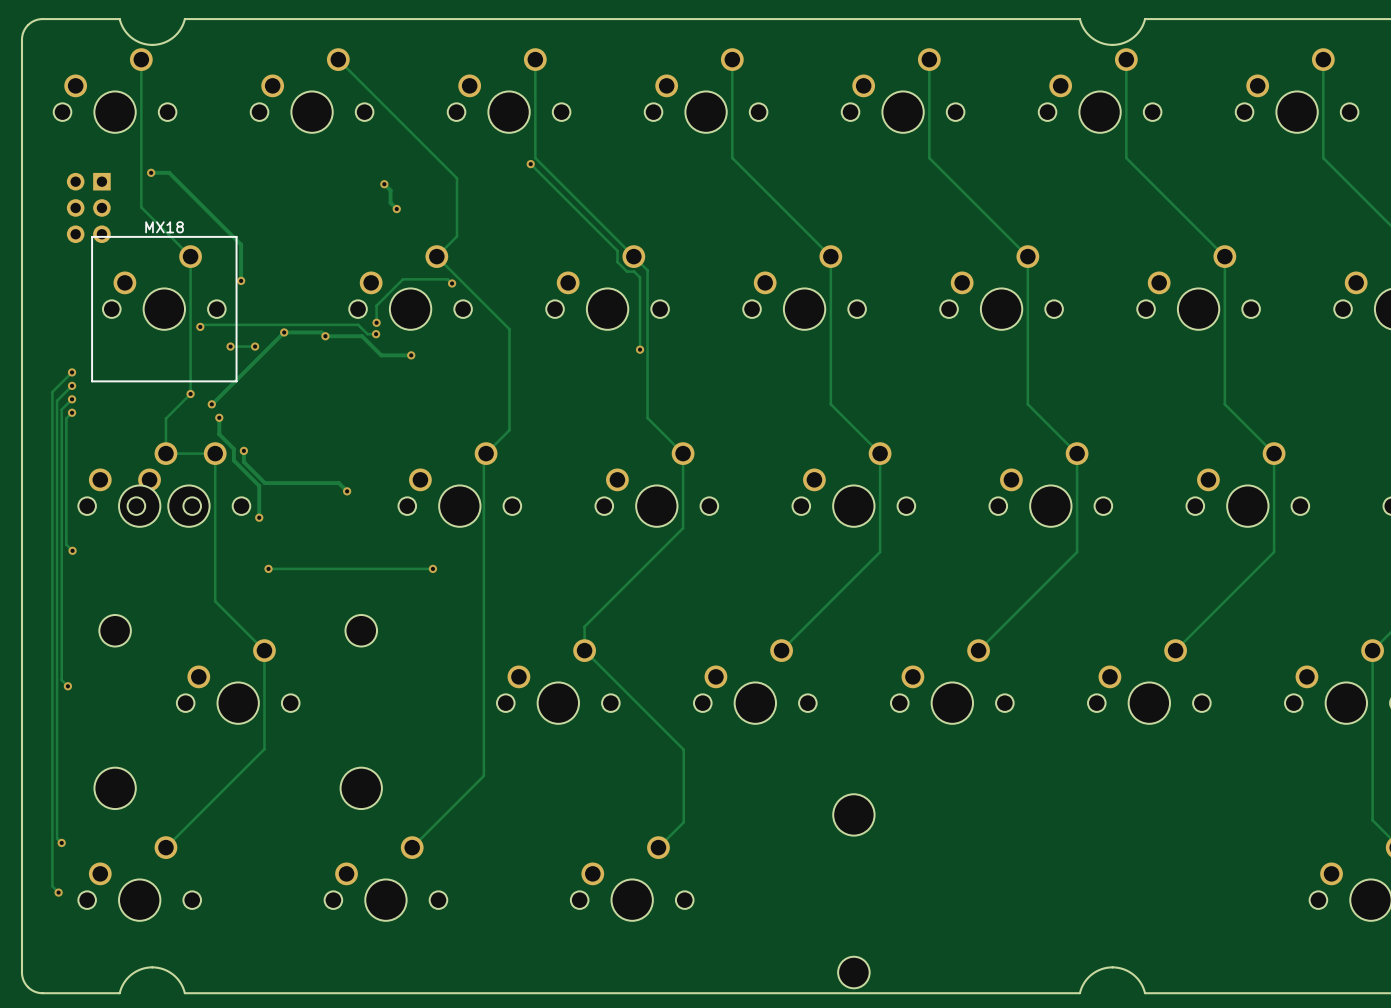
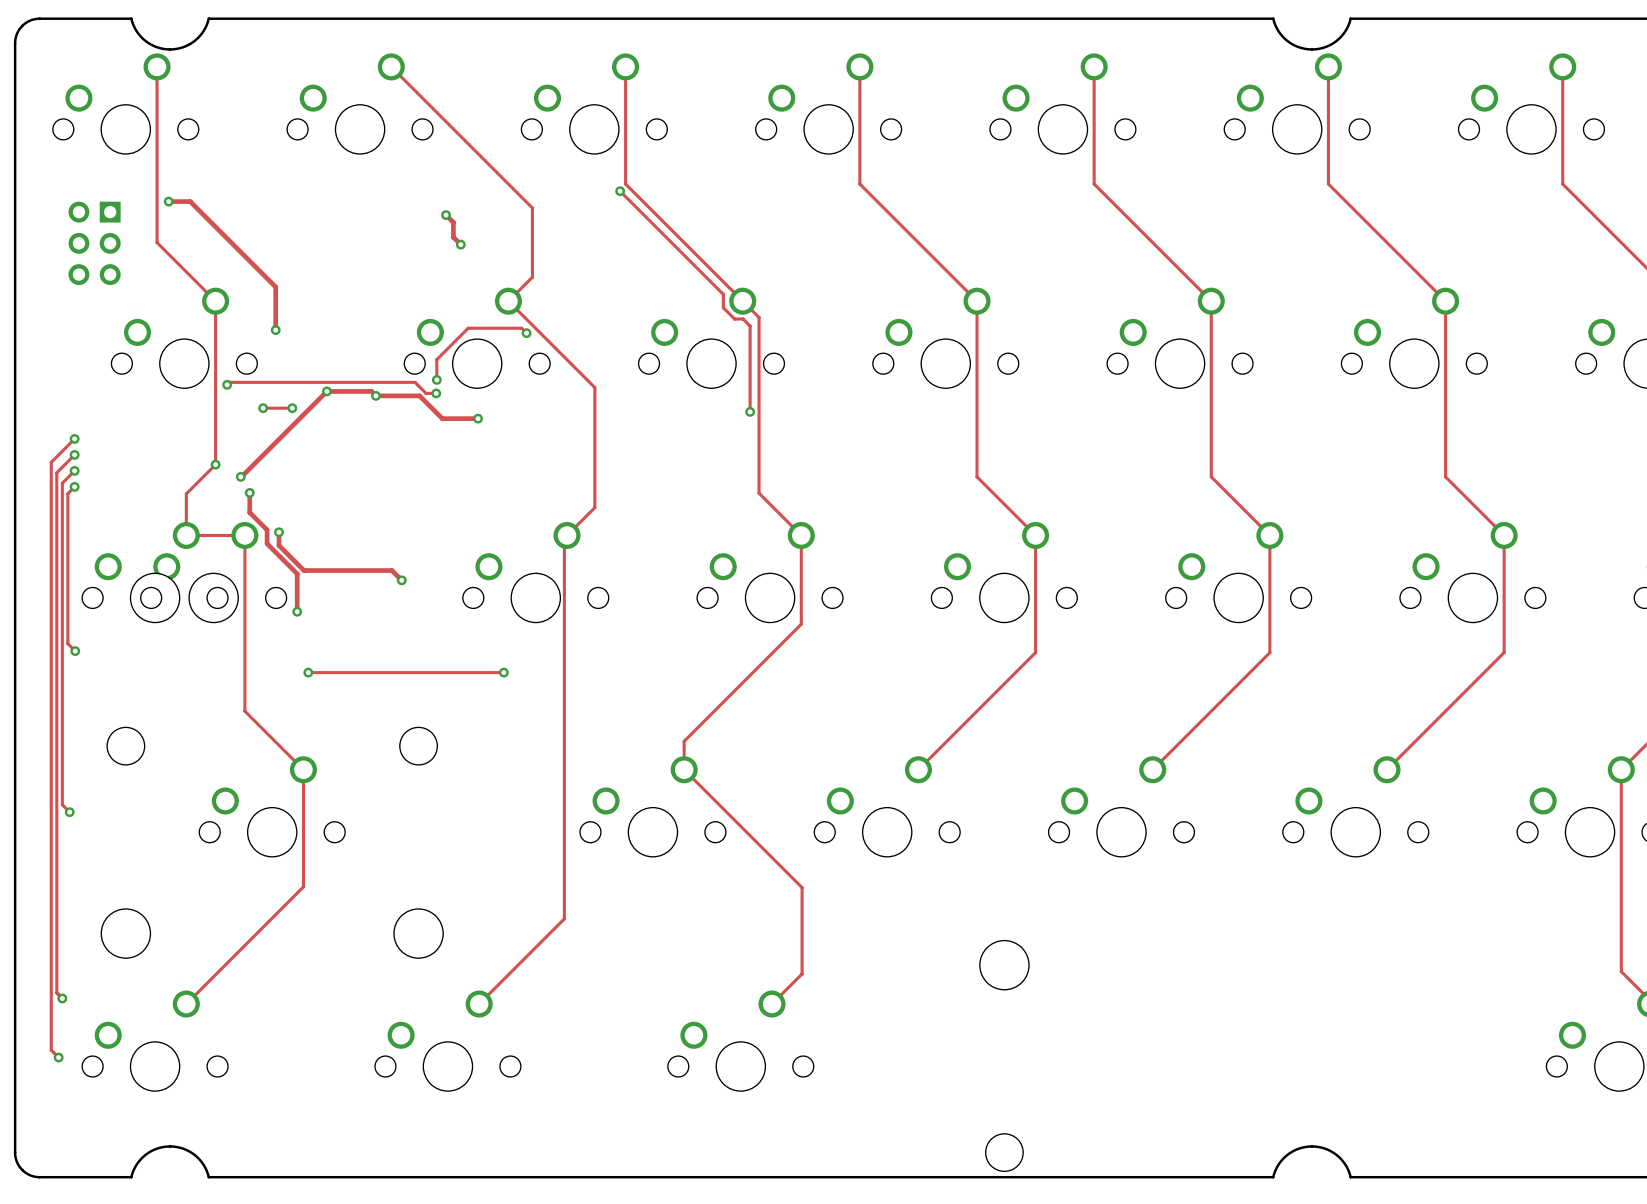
MX18: (164, 309) -> none

